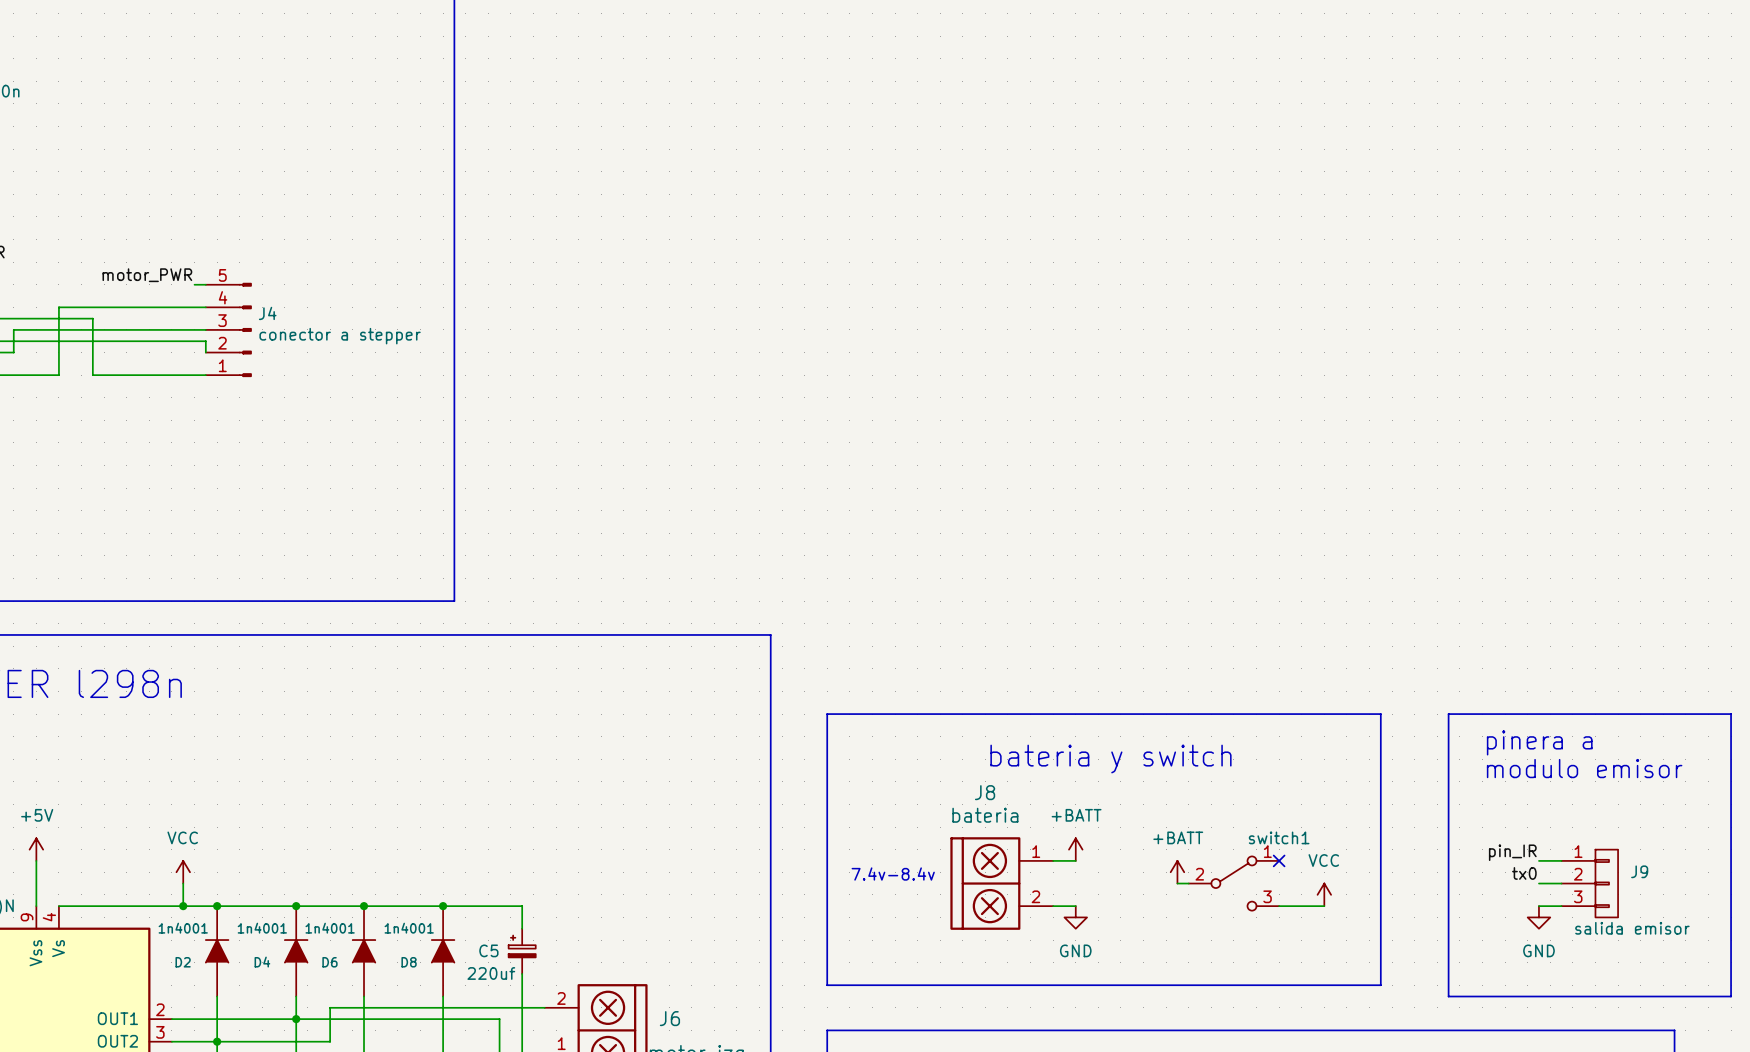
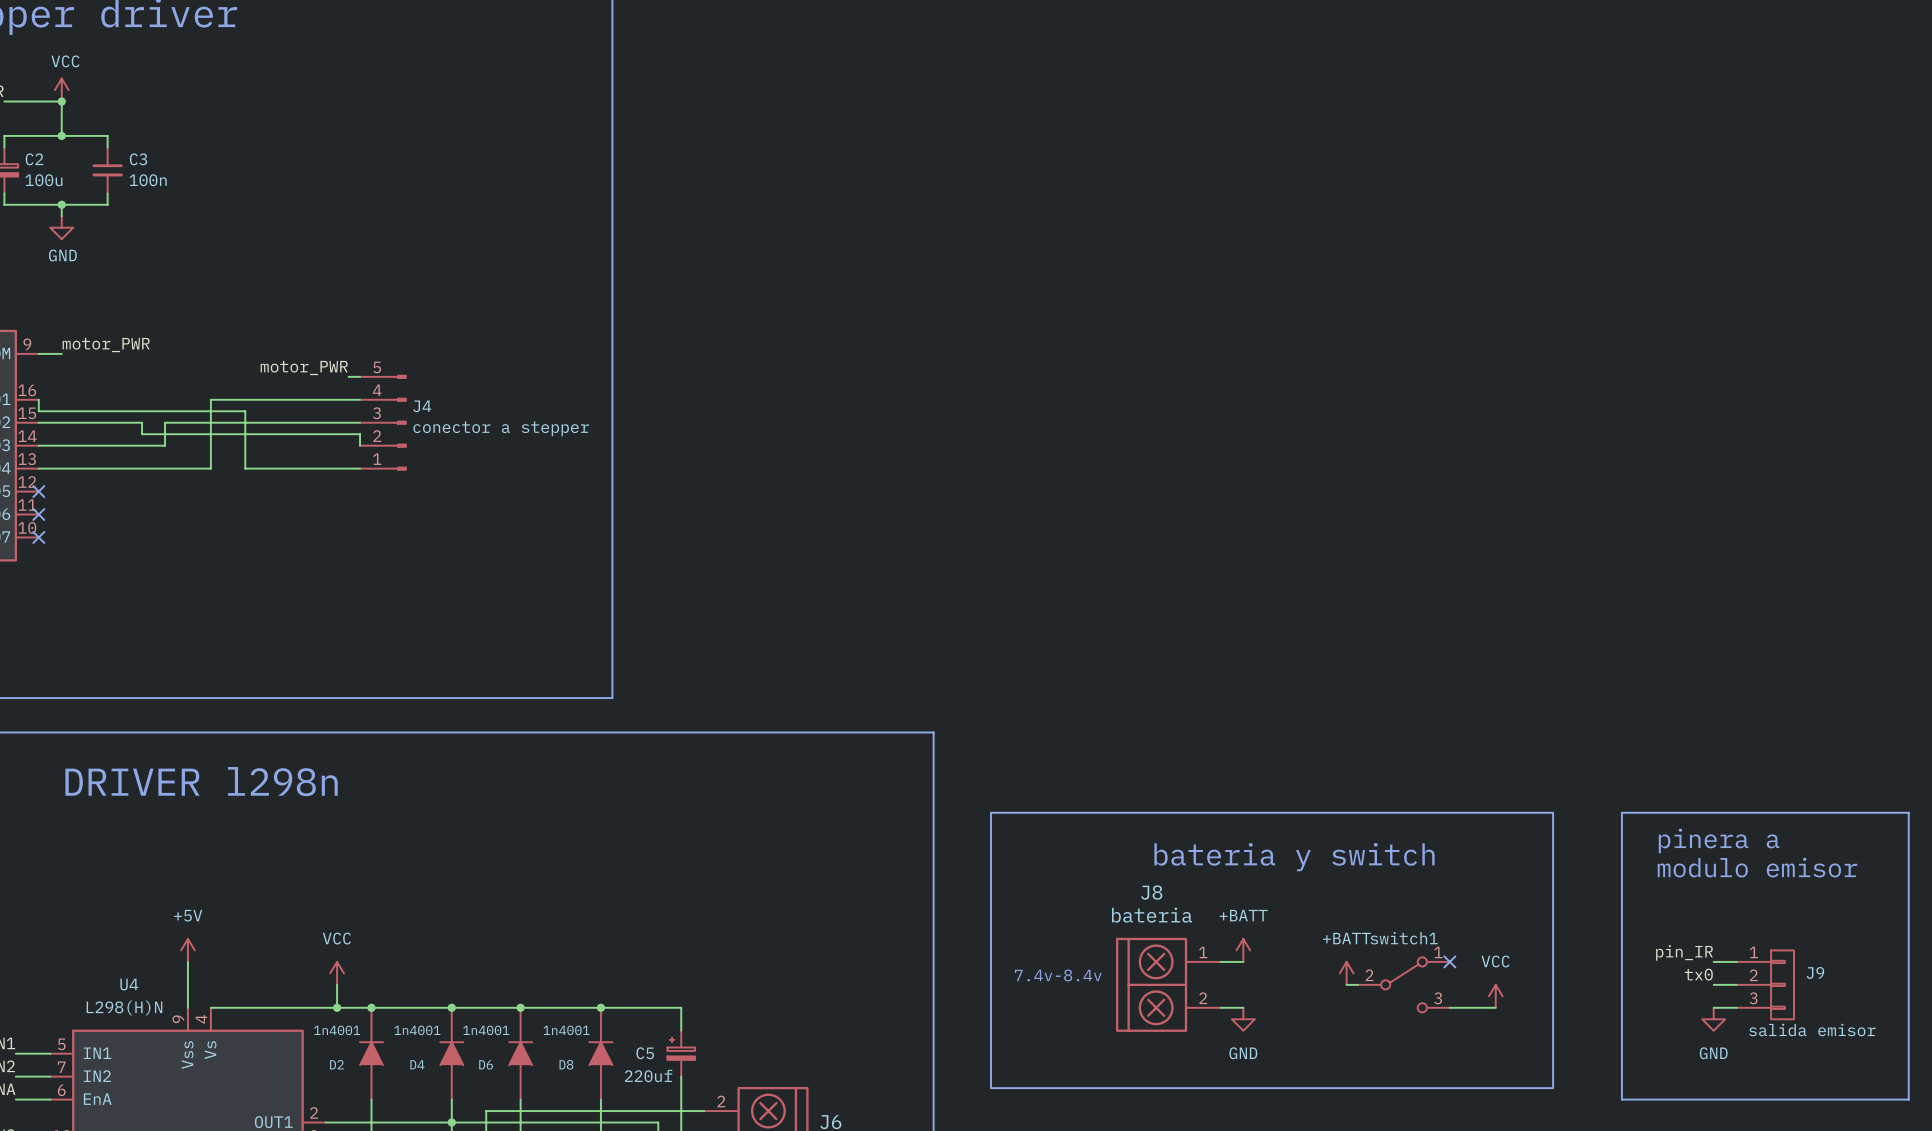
switch1 name position: switch1 (1279, 837) -> switch1 (1404, 938)

